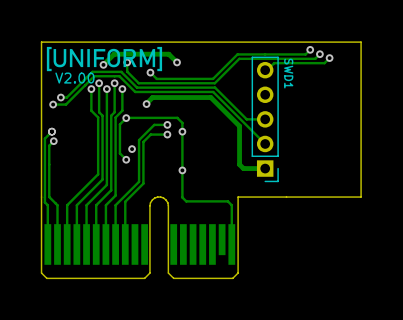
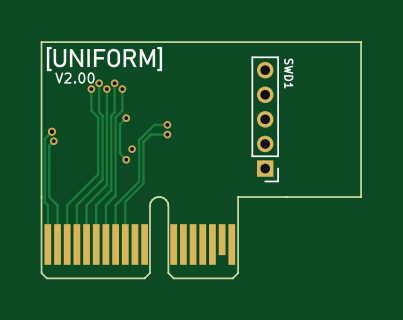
track: (310, 49) (305, 54) (237, 54) (213, 78) (156, 78) (150, 72) -> none
via: (310, 49) -> none
track: (319, 54) (315, 58) (239, 58) (214, 83) (138, 83) (127, 71) (127, 62) -> none
via: (319, 54) -> none
track: (329, 58) (324, 63) (274, 63) (265, 70) -> none
via: (329, 58) -> none
via: (127, 62) -> none
track: (177, 62) (168, 54) (114, 54) (103, 64) -> none
via: (177, 62) -> none
via: (103, 64) -> none
via: (150, 72) -> none
track: (60, 97) (66, 97) (92, 71) (121, 71) (137, 87) (215, 87) (246, 119) (265, 119) -> none
via: (60, 97) -> none
track: (53, 104) (65, 104) (94, 76) (119, 76) (135, 91) (213, 91) (265, 143) -> none
via: (53, 104) -> none
track: (146, 104) (152, 97) (210, 97) (239, 126) (239, 164) (243, 168) (265, 168) -> none
via: (146, 104) -> none
track: (126, 118) (177, 117) (182, 122) (182, 197) (186, 201) (227, 201) (231, 205) (231, 244) -> none
via: (182, 131) -> none
via: (182, 170) -> none

